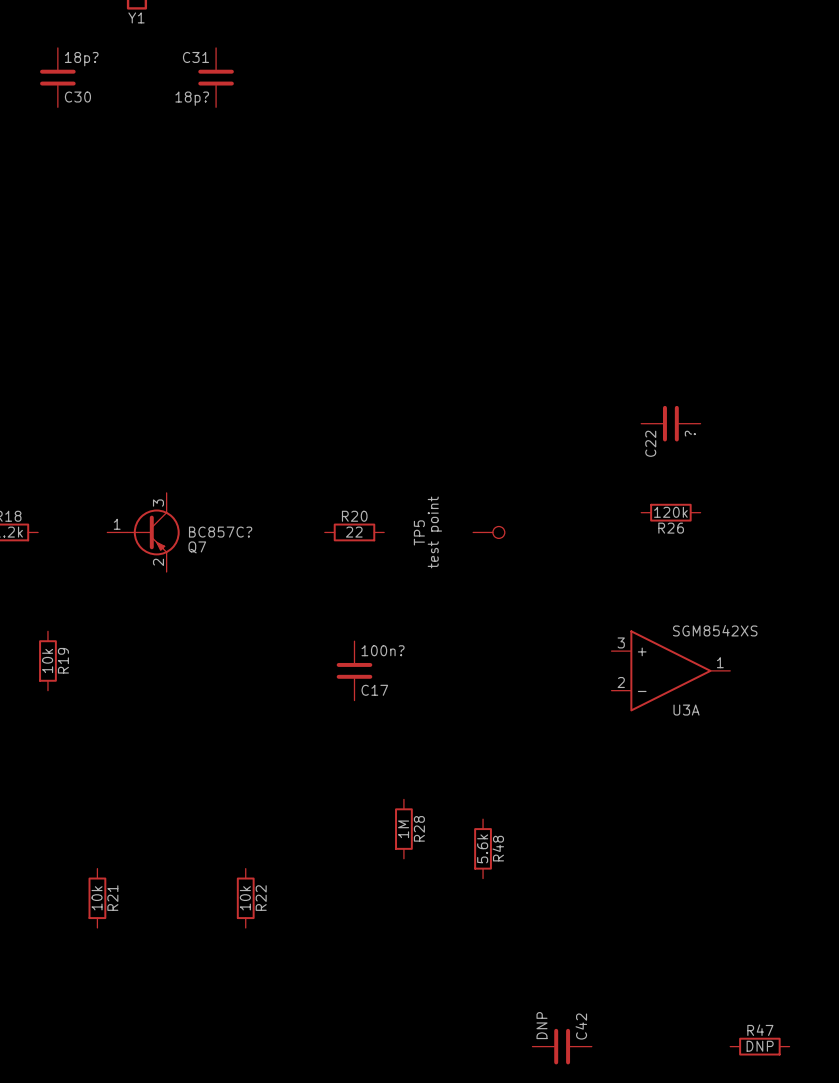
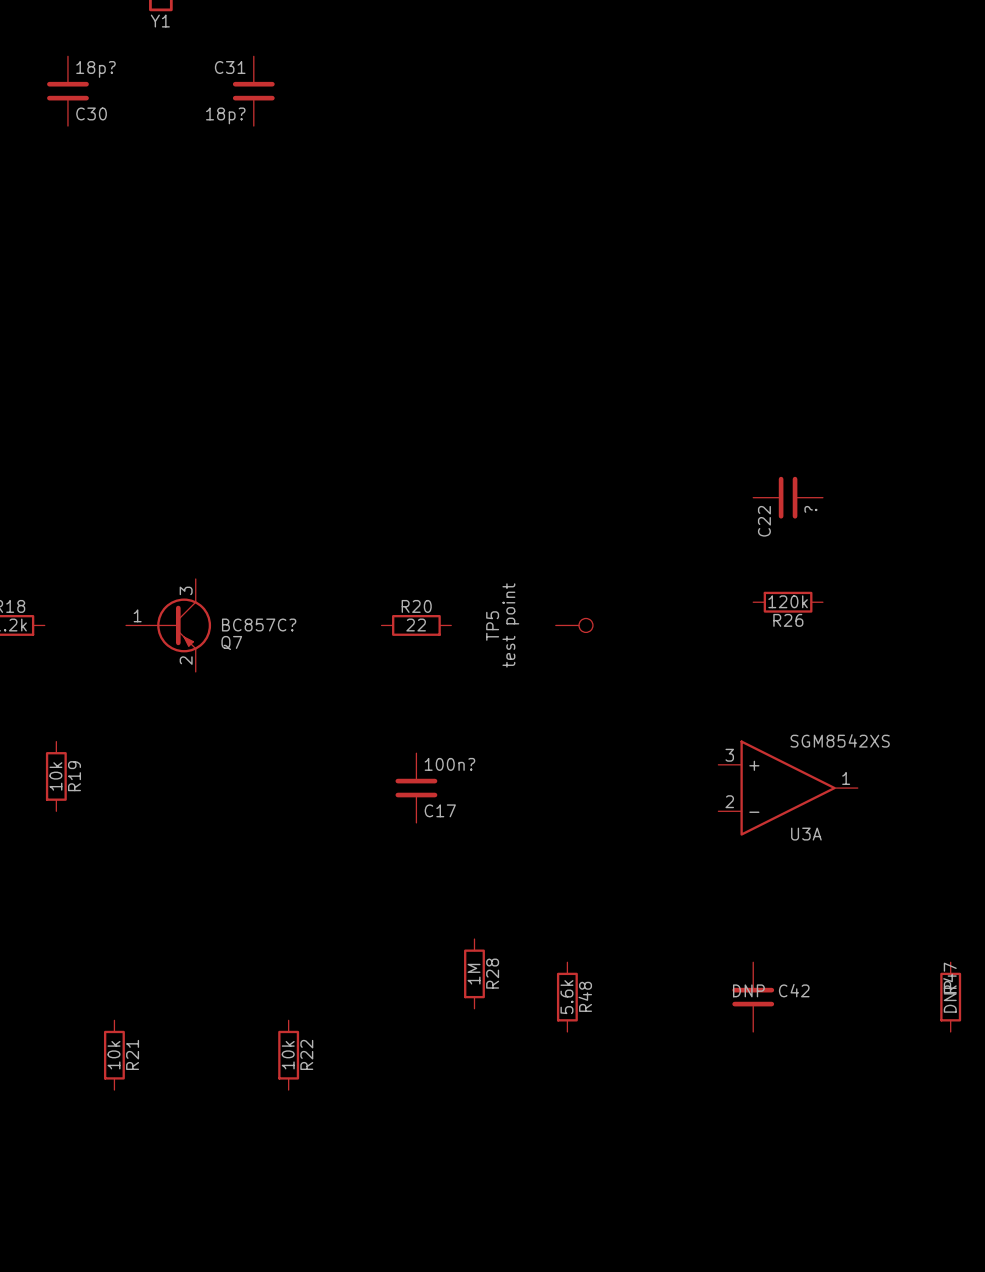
C42 value position: DNP (541, 1025) -> DNP (748, 990)
C42 name position: C42 (581, 1026) -> C42 (794, 990)
C42 rotation: 0° (562, 1046) -> 90° clockwise (753, 997)
C42 position: (562, 1046) -> (753, 997)
R47 rotation: 0° (759, 1046) -> 90° clockwise (950, 997)
R47 position: (759, 1046) -> (950, 997)

